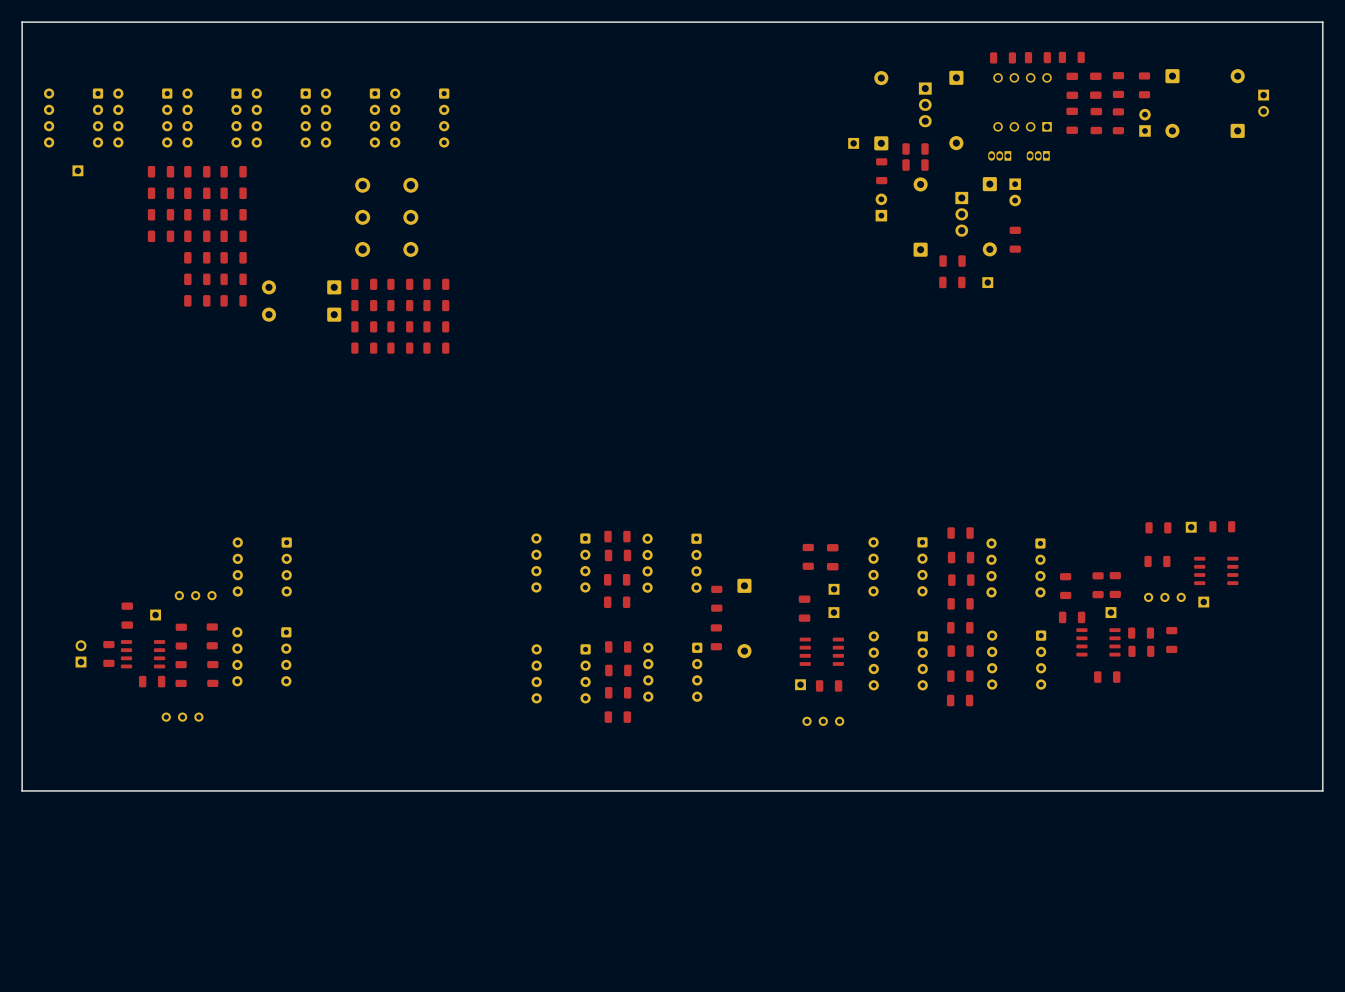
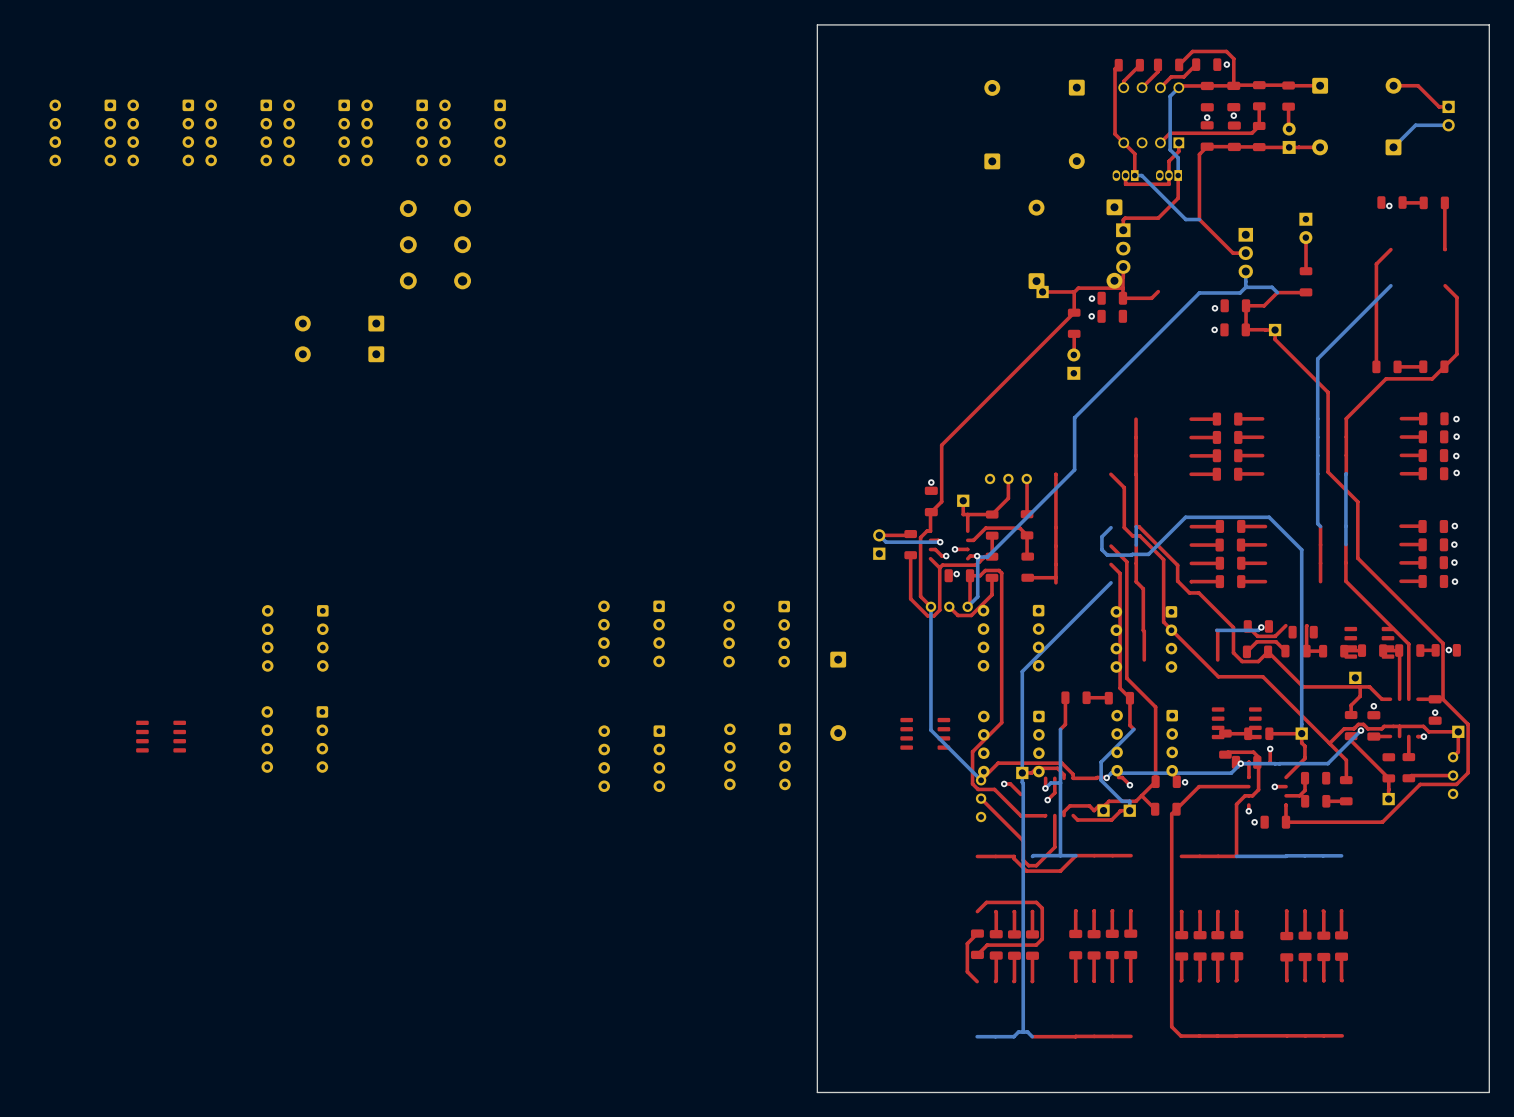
board edge: (725, 22) (22, 22) (22, 790) (1322, 790) -> (817, 24) (817, 1092) (1489, 1092) (1489, 890)
top track: none -> (1118, 65) (1115, 68) (1115, 134) (1134, 153) (1134, 175)
top track: none -> (1139, 65) (1123, 81) (1123, 87)
top track: none -> (1158, 64) (1158, 71) (1142, 87)
top track: none -> (1179, 64) (1192, 51) (1226, 51) (1233, 58) (1233, 85) (1180, 85) (1178, 87)
top track: none -> (1196, 64) (1183, 76) (1171, 76) (1160, 87)
via: none -> (1226, 64)
top track: none -> (1233, 85) (1320, 85)
top track: none -> (1393, 85) (1418, 85) (1439, 106) (1448, 106)
bottom track: none -> (1178, 87) (1170, 96) (1170, 149) (1178, 157) (1178, 175)
top track: none -> (1259, 106) (1259, 125) (1251, 133) (1170, 133) (1160, 142)
top track: none -> (1288, 106) (1289, 129)
via: none -> (1233, 115)
part position: (1263, 103) -> (1448, 116)
part: (925, 104) -> none
via: none -> (1207, 117)
bottom track: none -> (1448, 125) (1415, 125) (1393, 147)
top track: none -> (1178, 142) (1178, 151) (1168, 161) (1168, 184)
top track: none -> (1298, 147) (1207, 146) (1199, 154) (1199, 219) (1233, 253) (1245, 253)
top track: none -> (1320, 147) (1299, 147)
part position: (853, 143) -> (1042, 291)
part: (915, 148) -> none
top track: none -> (1125, 175) (1125, 184) (1168, 184)
bottom track: none -> (1134, 175) (1141, 175) (1185, 219) (1199, 219)
top track: none -> (1178, 175) (1178, 198) (1158, 218) (1125, 218) (1123, 220) (1123, 230)
part: (915, 165) -> none
part: (77, 170) -> none
part: (161, 171) -> none
part: (197, 171) -> none
part: (233, 171) -> none
part: (881, 171) -> none
part: none -> (1391, 202)
top track: none -> (1402, 202) (1423, 202)
part: none -> (1434, 202)
top track: none -> (1444, 202) (1445, 249)
via: none -> (1389, 205)
part: (1015, 192) -> none
part: (161, 193) -> none
part: (197, 193) -> none
part: (233, 193) -> none
part: none -> (1305, 228)
part: (881, 207) -> none
top track: none -> (1305, 237) (1306, 271)
part: (161, 214) -> none
part: (197, 214) -> none
part: (233, 214) -> none
part position: (961, 214) -> (1123, 248)
top track: none -> (1390, 249) (1376, 264) (1376, 366)
part: none -> (1245, 253)
part: (161, 236) -> none
part: (197, 236) -> none
part: (233, 236) -> none
top track: none -> (1123, 266) (1122, 298) (1151, 298) (1158, 291)
part: (1015, 239) -> none
bottom track: none -> (1245, 271) (1245, 287)
part: none -> (1306, 281)
bottom track: none -> (1390, 285) (1317, 358) (1317, 523) (1320, 526)
top track: none -> (1445, 285) (1456, 297) (1456, 354) (1432, 378) (1386, 378) (1346, 418) (1346, 473)
top track: none -> (1122, 288) (1078, 288) (1074, 292)
bottom track: none -> (1245, 287) (1240, 292) (1199, 292) (1074, 417) (1074, 469) (987, 557) (978, 557)
bottom track: none -> (1245, 287) (1272, 287) (1277, 292)
part: (197, 257) -> none
part: (233, 257) -> none
top track: none -> (1073, 291) (1042, 291)
top track: none -> (1074, 292) (1074, 312) (941, 445) (941, 501) (930, 512) (930, 531) (926, 531) (920, 537) (920, 596) (930, 606)
top track: none -> (1306, 292) (1277, 292) (1264, 305) (1246, 305) (1246, 329)
part position: (952, 261) -> (1112, 298)
via: none -> (1091, 298)
part: none -> (1235, 305)
via: none -> (1214, 308)
part footprint: [939, 276, 966, 289] -> [1067, 308, 1081, 338]
part footprint: [982, 277, 994, 289] -> [1097, 309, 1128, 323]
part: (197, 279) -> none
part: (233, 279) -> none
via: none -> (1091, 316)
part: (364, 284) -> none
part: (400, 284) -> none
part: (436, 284) -> none
via: none -> (1214, 329)
part: none -> (1235, 329)
top track: none -> (1245, 329) (1275, 330) (1275, 339) (1328, 392) (1328, 472) (1357, 501) (1357, 558) (1443, 643) (1443, 699)
part: none -> (1275, 330)
top track: none -> (1074, 333) (1073, 354)
part: (197, 300) -> none
part: (233, 300) -> none
part: (364, 305) -> none
part: (400, 305) -> none
part: (436, 305) -> none
part: none -> (1073, 364)
part: none -> (1386, 366)
top track: none -> (1423, 366) (1397, 366)
part: none -> (1433, 366)
part: (364, 326) -> none
part: (400, 326) -> none
part: (436, 326) -> none
part: (364, 348) -> none
part: (400, 348) -> none
part: (436, 348) -> none
top track: none -> (1401, 418) (1423, 418)
part: none -> (1433, 418)
top track: none -> (1136, 419) (1136, 526) (1139, 526) (1177, 565) (1177, 581) (1189, 592) (1198, 592) (1233, 627) (1233, 652) (1242, 661) (1258, 661) (1268, 651) (1303, 686) (1369, 686) (1381, 699) (1390, 699)
top track: none -> (1216, 419) (1191, 419)
part: none -> (1227, 419)
top track: none -> (1262, 418) (1238, 419)
via: none -> (1456, 419)
via: none -> (1456, 436)
top track: none -> (1216, 437) (1191, 437)
part: none -> (1227, 437)
top track: none -> (1262, 437) (1238, 437)
top track: none -> (1422, 436) (1401, 437)
part: none -> (1433, 436)
top track: none -> (1216, 455) (1191, 455)
part: none -> (1227, 455)
top track: none -> (1262, 455) (1238, 455)
top track: none -> (1401, 455) (1422, 455)
part: none -> (1433, 455)
via: none -> (1456, 456)
top track: none -> (1262, 473) (1238, 474)
bottom track: none -> (1346, 473) (1345, 544)
top track: none -> (1422, 473) (1401, 473)
part: none -> (1433, 473)
via: none -> (1456, 472)
top track: none -> (1055, 474) (1055, 582)
top track: none -> (1110, 474) (1124, 487) (1124, 527) (1132, 535) (1139, 535) (1163, 559) (1163, 622) (1218, 676) (1262, 676) (1346, 760) (1346, 780)
top track: none -> (1216, 474) (1191, 474)
part: none -> (1227, 474)
top track: none -> (1008, 478) (1008, 498) (992, 514) (963, 514) (963, 500)
part: none -> (1008, 478)
top track: none -> (1026, 478) (1027, 514)
via: none -> (931, 482)
part: none -> (963, 500)
part: none -> (931, 501)
top track: none -> (967, 514) (967, 531)
part: none -> (992, 525)
part: none -> (1027, 524)
bottom track: none -> (1136, 526) (1136, 545)
top track: none -> (1219, 526) (1191, 526)
part: none -> (1230, 526)
top track: none -> (1265, 526) (1241, 526)
top track: none -> (1320, 526) (1320, 581)
top track: none -> (1401, 526) (1422, 526)
part: none -> (1433, 526)
via: none -> (1454, 526)
bottom track: none -> (1111, 527) (1101, 536) (1101, 549) (1107, 555) (1148, 554) (1185, 517) (1269, 517) (1301, 549) (1301, 733)
top track: none -> (910, 534) (879, 535)
bottom track: none -> (879, 535) (886, 542) (940, 542)
top track: none -> (992, 535) (991, 556) (984, 556) (975, 565) (942, 565) (939, 567)
top track: none -> (930, 540) (940, 542)
top track: none -> (967, 540) (973, 540) (985, 528) (1019, 528) (1027, 535) (1027, 556)
via: none -> (940, 542)
part: none -> (879, 544)
part: none -> (910, 544)
top track: none -> (1265, 544) (1241, 545)
top track: none -> (1345, 544) (1345, 581) (1408, 644) (1408, 699)
top track: none -> (1401, 544) (1422, 544)
part: none -> (1433, 544)
via: none -> (1454, 544)
top track: none -> (1136, 545) (1136, 581) (1143, 588) (1144, 659)
top track: none -> (1219, 545) (1191, 545)
part: none -> (1230, 545)
top track: none -> (1111, 546) (1126, 561) (1126, 678) (1155, 707) (1155, 781) (1141, 795)
top track: none -> (954, 549) (967, 549)
via: none -> (954, 549)
top track: none -> (930, 549) (935, 549) (941, 556) (946, 556)
top track: none -> (910, 555) (910, 598) (927, 615) (934, 615) (939, 610) (939, 567)
via: none -> (946, 556)
top track: none -> (977, 556) (970, 556) (967, 558)
via: none -> (977, 556)
bottom track: none -> (978, 557) (977, 596) (967, 606)
top track: none -> (930, 558) (939, 567)
top track: none -> (1422, 562) (1401, 562)
part: none -> (1433, 562)
via: none -> (1454, 562)
top track: none -> (1219, 563) (1191, 563)
part: none -> (1230, 563)
top track: none -> (1265, 563) (1241, 563)
top track: none -> (1111, 564) (1120, 573) (1120, 688) (1129, 698) (1129, 725) (1133, 729)
part: none -> (991, 567)
part: none -> (1027, 567)
via: none -> (956, 574)
top track: none -> (991, 577) (991, 594) (971, 615) (957, 615) (949, 606)
top track: none -> (1055, 577) (1027, 577)
top track: none -> (1219, 581) (1191, 581)
part: none -> (1230, 581)
top track: none -> (1265, 581) (1241, 581)
top track: none -> (1401, 581) (1422, 581)
part: none -> (1433, 581)
via: none -> (1454, 581)
bottom track: none -> (1111, 582) (1022, 671) (1023, 1032)
part: (1222, 526) -> none
part: (1158, 527) -> none
part: (1191, 527) -> none
part: (960, 533) -> none
part: (617, 536) -> none
bottom track: none -> (930, 606) (930, 730) (981, 780)
part: none -> (949, 606)
top track: none -> (967, 606) (970, 604) (970, 575) (980, 575) (985, 570) (999, 570) (1001, 573) (1001, 722) (972, 751) (972, 783) (978, 789) (994, 789) (1020, 815) (1045, 815)
part: (618, 555) -> none
top track: none -> (1285, 625) (1275, 636) (1257, 636) (1247, 626)
top track: none -> (1307, 625) (1306, 651) (1323, 651)
part: (808, 556) -> none
part: none -> (1258, 626)
part rotation: 0° (832, 557) -> 90° clockwise (959, 575)
part position: (832, 557) -> (959, 575)
part: (961, 557) -> none
bottom track: none -> (1261, 627) (1258, 630) (1216, 630)
via: none -> (1261, 627)
top track: none -> (1216, 630) (1217, 659)
top track: none -> (1362, 650) (1344, 651)
part: none -> (1372, 650)
top track: none -> (1399, 650) (1399, 699)
top track: none -> (1399, 650) (1383, 650)
part: none -> (1409, 650)
top track: none -> (1435, 650) (1420, 650)
part: none -> (1446, 650)
via: none -> (1448, 650)
top track: none -> (1285, 651) (1276, 641) (1256, 641) (1246, 651)
part: none -> (1296, 651)
part: none -> (1333, 651)
part: (617, 579) -> none
part: (961, 580) -> none
part: (1098, 585) -> none
part rotation: 0° (1115, 585) -> 90° clockwise (1257, 651)
part: (1065, 586) -> none
part: (834, 589) -> none
part: (195, 595) -> none
part rotation: 0° (1164, 597) -> 90° clockwise (1453, 775)
part position: (1164, 597) -> (1453, 775)
part: (716, 598) -> none
part: (617, 602) -> none
part: (960, 603) -> none
part: (804, 608) -> none
top track: none -> (1360, 686) (1360, 696) (1351, 705) (1351, 715)
part: (833, 612) -> none
part position: (1110, 612) -> (1301, 733)
part: (155, 614) -> none
part: (127, 615) -> none
part: (1072, 617) -> none
top track: none -> (1065, 697) (1065, 724) (1060, 729)
part: none -> (1076, 697)
top track: none -> (1086, 697) (1108, 698)
part: none -> (1119, 698)
top track: none -> (1435, 699) (1417, 699)
top track: none -> (1443, 699) (1468, 724) (1468, 772) (1456, 784) (1420, 784) (1382, 822) (1285, 822) (1285, 805)
part: (960, 627) -> none
via: none -> (1373, 706)
part: none -> (1435, 709)
via: none -> (1435, 712)
part: (1141, 633) -> none
part: (181, 636) -> none
part: (212, 636) -> none
part: (716, 637) -> none
part: (1171, 640) -> none
part: none -> (1351, 725)
part: none -> (1373, 725)
top track: none -> (1399, 726) (1399, 736)
part: (618, 646) -> none
bottom track: none -> (1060, 729) (1060, 855)
bottom track: none -> (1133, 729) (1101, 762) (1101, 780) (1122, 801) (1129, 801) (1129, 810)
bottom track: none -> (1360, 730) (1327, 763) (1240, 763) (1231, 773) (1111, 773) (1106, 777)
via: none -> (1360, 730)
part: none -> (1458, 731)
part: (960, 651) -> none
top track: none -> (1225, 733) (1248, 733)
part: none -> (1258, 733)
part: (1141, 651) -> none
top track: none -> (1301, 733) (1301, 743) (1304, 746) (1304, 758) (1286, 777)
top track: none -> (1301, 733) (1269, 733)
part: (81, 653) -> none
part: (108, 653) -> none
top track: none -> (1351, 736) (1351, 740) (1388, 778) (1388, 799)
top track: none -> (1390, 736) (1373, 736)
top track: none -> (1408, 736) (1408, 757)
top track: none -> (1417, 736) (1423, 736)
via: none -> (1423, 736)
part: none -> (1225, 744)
top track: none -> (1329, 743) (1344, 728) (1353, 728) (1358, 724) (1363, 724) (1367, 728) (1381, 728) (1384, 726) (1423, 726) (1428, 731) (1458, 731) (1458, 751) (1453, 757)
top track: none -> (1270, 748) (1270, 762)
via: none -> (1270, 748)
part: (618, 670) -> none
top track: none -> (1225, 754) (1227, 752) (1253, 752) (1258, 757) (1258, 789) (1252, 795) (1245, 795) (1236, 804) (1236, 856) (1181, 856)
part: (212, 673) -> none
part: (181, 674) -> none
part: (960, 676) -> none
top track: none -> (1240, 763) (1248, 762) (1248, 777)
via: none -> (1240, 763)
part: (152, 681) -> none
part: none -> (1388, 767)
part: none -> (1408, 767)
part: (800, 684) -> none
part: (829, 685) -> none
top track: none -> (1022, 772) (1031, 772) (1036, 768) (1057, 768) (1064, 774) (1064, 778)
part: none -> (1022, 772)
top track: none -> (1453, 775) (1411, 775) (1408, 778)
top track: none -> (1106, 777) (1073, 778) (1073, 774) (1061, 763) (998, 763) (981, 780)
via: none -> (1106, 777)
top track: none -> (1118, 777) (1122, 777) (1129, 785)
top track: none -> (1045, 778) (1045, 788)
top track: none -> (1054, 778) (1054, 792) (1047, 800)
top track: none -> (1305, 778) (1305, 790) (1299, 795) (1286, 795)
part: none -> (1315, 778)
part: (618, 692) -> none
part: none -> (1166, 781)
via: none -> (1185, 782)
bottom track: none -> (1060, 783) (1050, 783) (1045, 788)
top track: none -> (1004, 783) (1010, 783) (1020, 794)
via: none -> (1004, 783)
via: none -> (1129, 785)
top track: none -> (1248, 786) (1199, 786) (1171, 814) (1171, 1026) (1180, 1036) (1342, 1035)
via: none -> (1274, 786)
top track: none -> (1286, 786) (1274, 786)
via: none -> (1045, 788)
part: (960, 700) -> none
part: none -> (1346, 790)
top track: none -> (1141, 795) (1136, 801) (1109, 801) (1104, 805) (1099, 805) (1094, 810) (1089, 805) (1069, 805) (1064, 811) (1064, 815)
top track: none -> (1141, 795) (1155, 809)
top track: none -> (981, 798) (1023, 840) (1023, 860) (1028, 865) (1036, 865) (1054, 847) (1054, 815)
part: none -> (1388, 799)
via: none -> (1047, 800)
part: none -> (1315, 801)
top track: none -> (1346, 801) (1326, 801)
top track: none -> (1248, 804) (1248, 811)
part: (182, 717) -> none
part: (617, 717) -> none
part: none -> (1165, 809)
part: none -> (1103, 810)
top track: none -> (1129, 810) (1120, 810) (1111, 820) (1077, 820) (1073, 815)
part: none -> (1129, 810)
via: none -> (1248, 811)
part rotation: 0° (823, 721) -> 90° clockwise (981, 798)
part position: (823, 721) -> (981, 798)
via: none -> (1254, 822)
part: none -> (1275, 822)
bottom track: none -> (1075, 855) (1032, 856)
top track: none -> (1131, 855) (1075, 855) (1060, 871) (1026, 871) (1014, 856) (977, 856)
bottom track: none -> (1341, 855) (1236, 856)
top track: none -> (1075, 910) (1075, 933)
top track: none -> (1094, 910) (1094, 934)
top track: none -> (1112, 910) (1112, 933)
top track: none -> (1131, 910) (1130, 933)
top track: none -> (977, 911) (986, 902) (1036, 902) (1042, 908) (1042, 939) (1036, 945) (987, 945) (977, 954)
top track: none -> (995, 911) (996, 934)
top track: none -> (1014, 911) (1014, 934)
top track: none -> (1032, 911) (1032, 934)
top track: none -> (1181, 911) (1181, 935)
top track: none -> (1199, 911) (1200, 935)
top track: none -> (1218, 911) (1217, 935)
top track: none -> (1236, 911) (1236, 934)
top track: none -> (1286, 910) (1286, 936)
top track: none -> (1304, 910) (1305, 935)
top track: none -> (1323, 910) (1323, 935)
top track: none -> (1341, 911) (1341, 935)
top track: none -> (977, 933) (967, 943) (967, 971) (977, 981)
part: none -> (977, 944)
part: none -> (1075, 944)
part: none -> (1112, 944)
part: none -> (1130, 944)
part: none -> (996, 944)
part: none -> (1014, 945)
part: none -> (1032, 945)
part: none -> (1094, 944)
part: none -> (1236, 945)
part: none -> (1181, 945)
part: none -> (1200, 945)
part: none -> (1217, 945)
part: none -> (1286, 946)
part: none -> (1305, 946)
part: none -> (1323, 946)
part: none -> (1341, 946)
top track: none -> (996, 955) (995, 981)
top track: none -> (1014, 955) (1013, 981)
top track: none -> (1032, 955) (1032, 981)
top track: none -> (1075, 955) (1075, 981)
top track: none -> (1094, 955) (1094, 981)
top track: none -> (1112, 955) (1112, 981)
top track: none -> (1130, 955) (1130, 981)
top track: none -> (1181, 956) (1180, 980)
top track: none -> (1200, 956) (1199, 980)
top track: none -> (1217, 956) (1217, 980)
top track: none -> (1236, 956) (1236, 980)
top track: none -> (1341, 956) (1342, 980)
top track: none -> (1286, 957) (1287, 980)
top track: none -> (1305, 957) (1305, 980)
top track: none -> (1323, 957) (1323, 980)
bottom track: none -> (1032, 1036) (1027, 1032) (1018, 1032) (1013, 1036) (977, 1036)
top track: none -> (1130, 1036) (1032, 1036)

